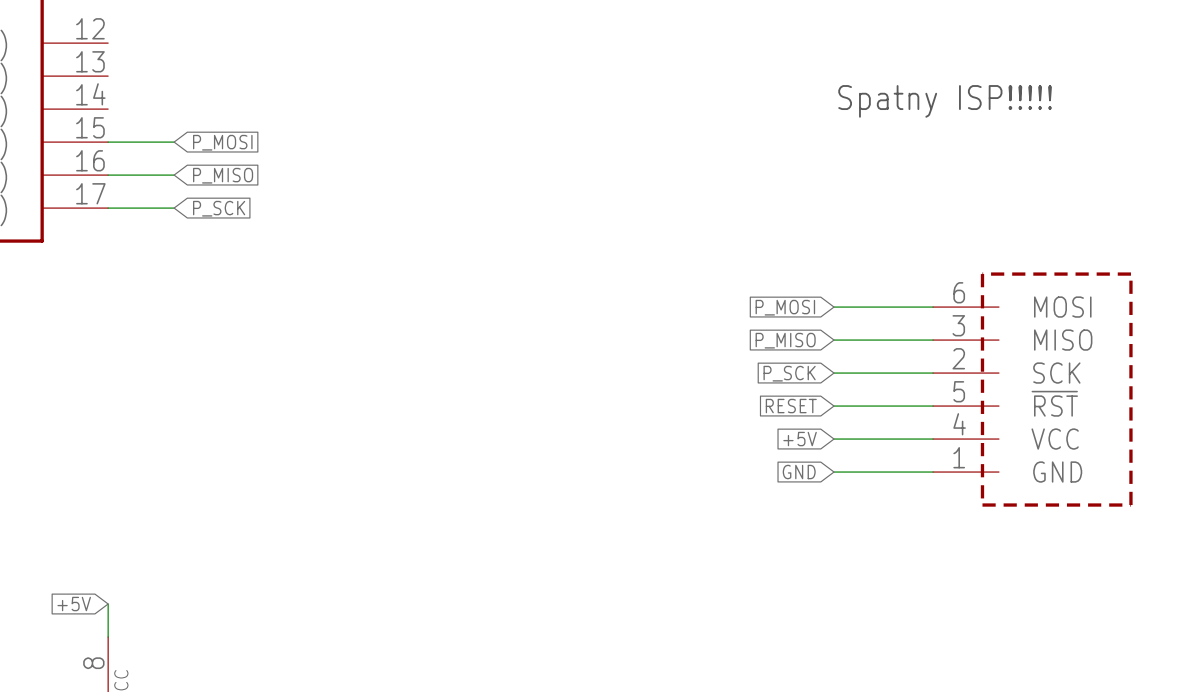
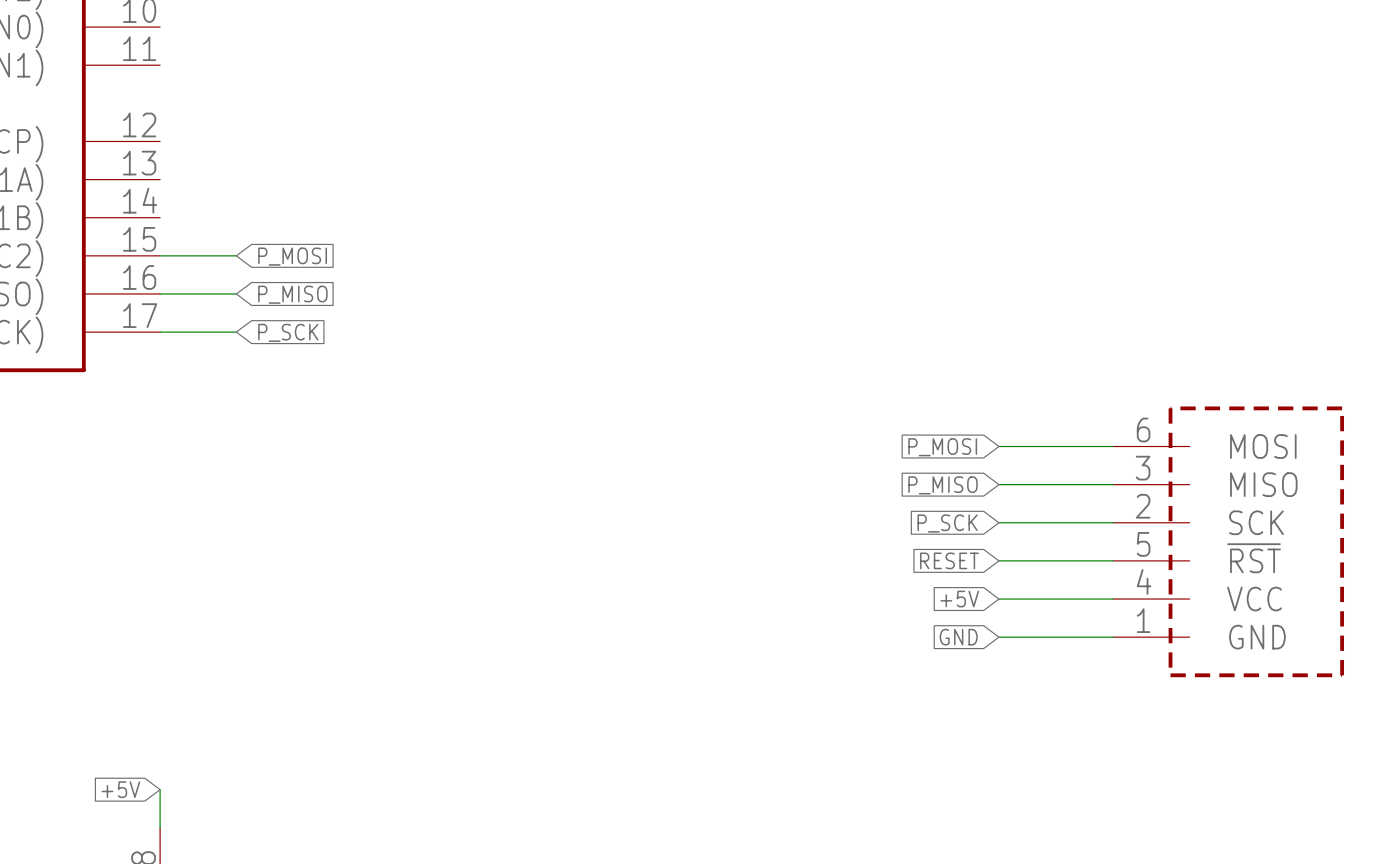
text: Spatny ISP!!!!! (945, 101) -> none

